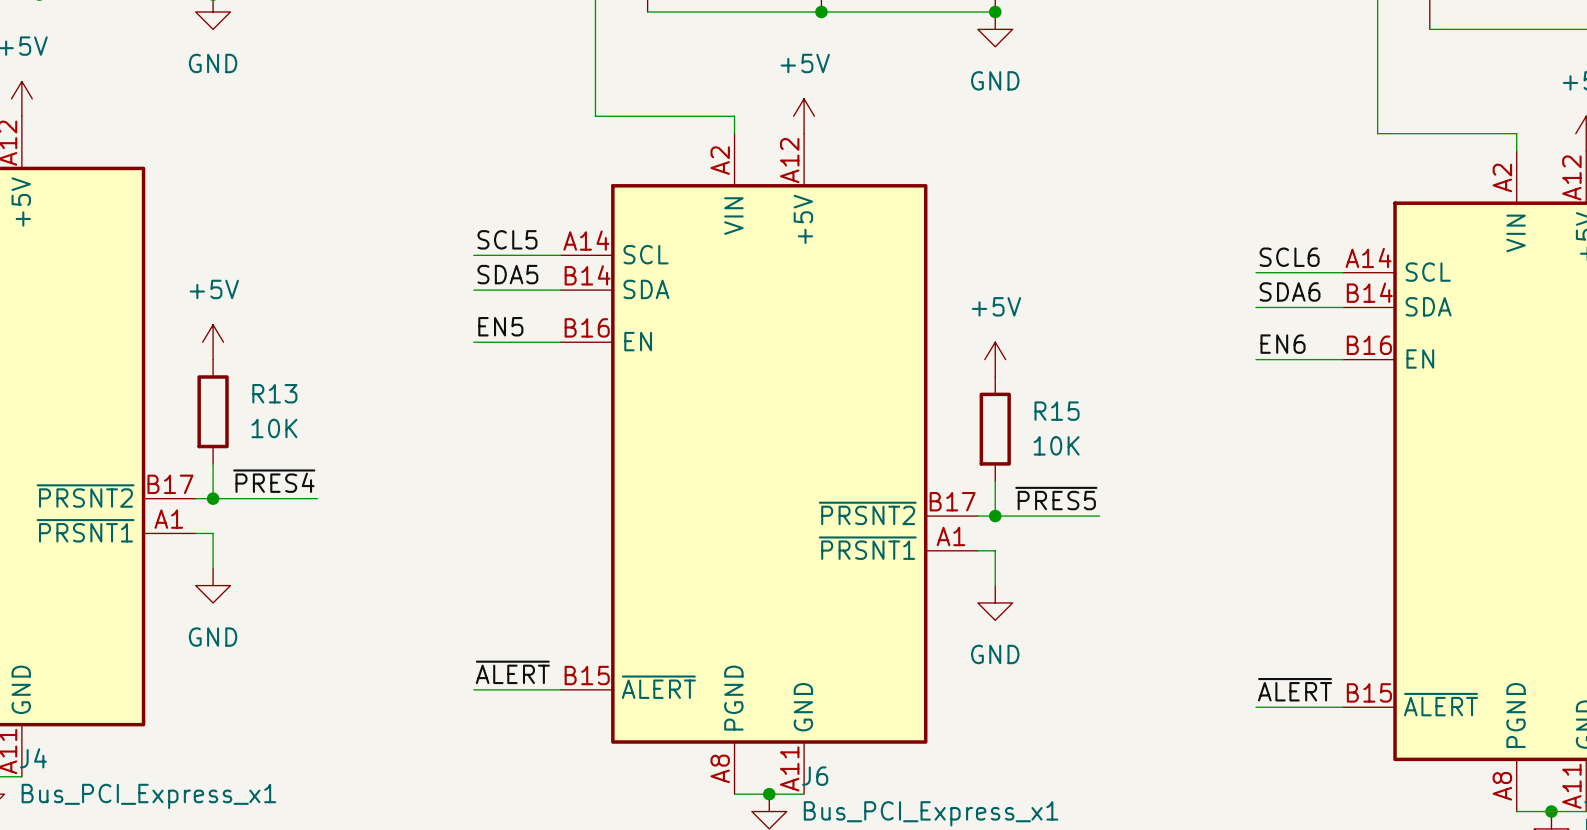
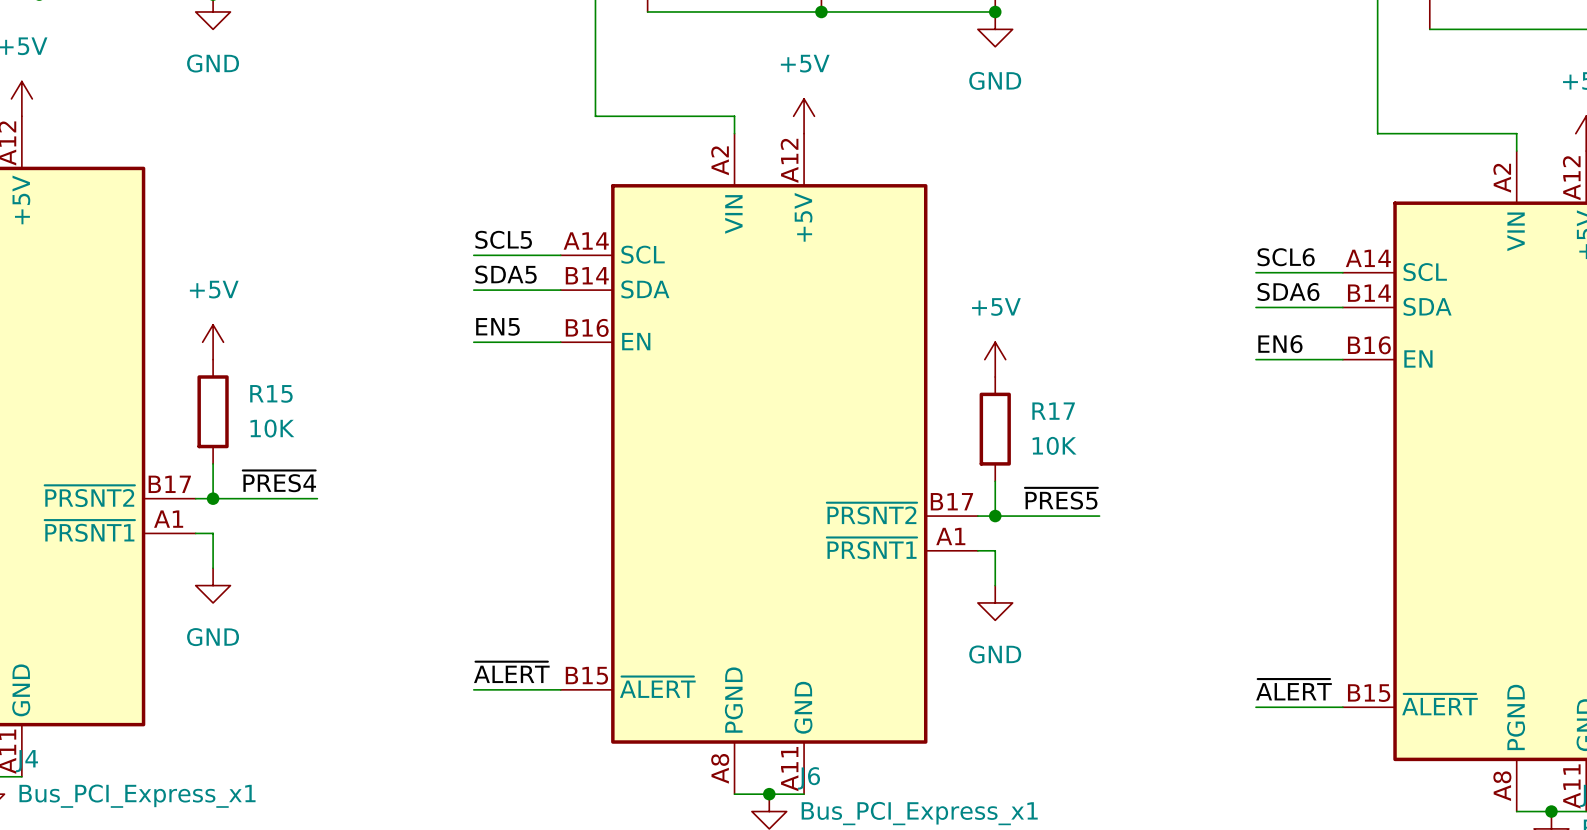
R13 name: R13 (274, 393) -> R15 (271, 393)
R15 name: R15 (1057, 411) -> R17 (1053, 411)

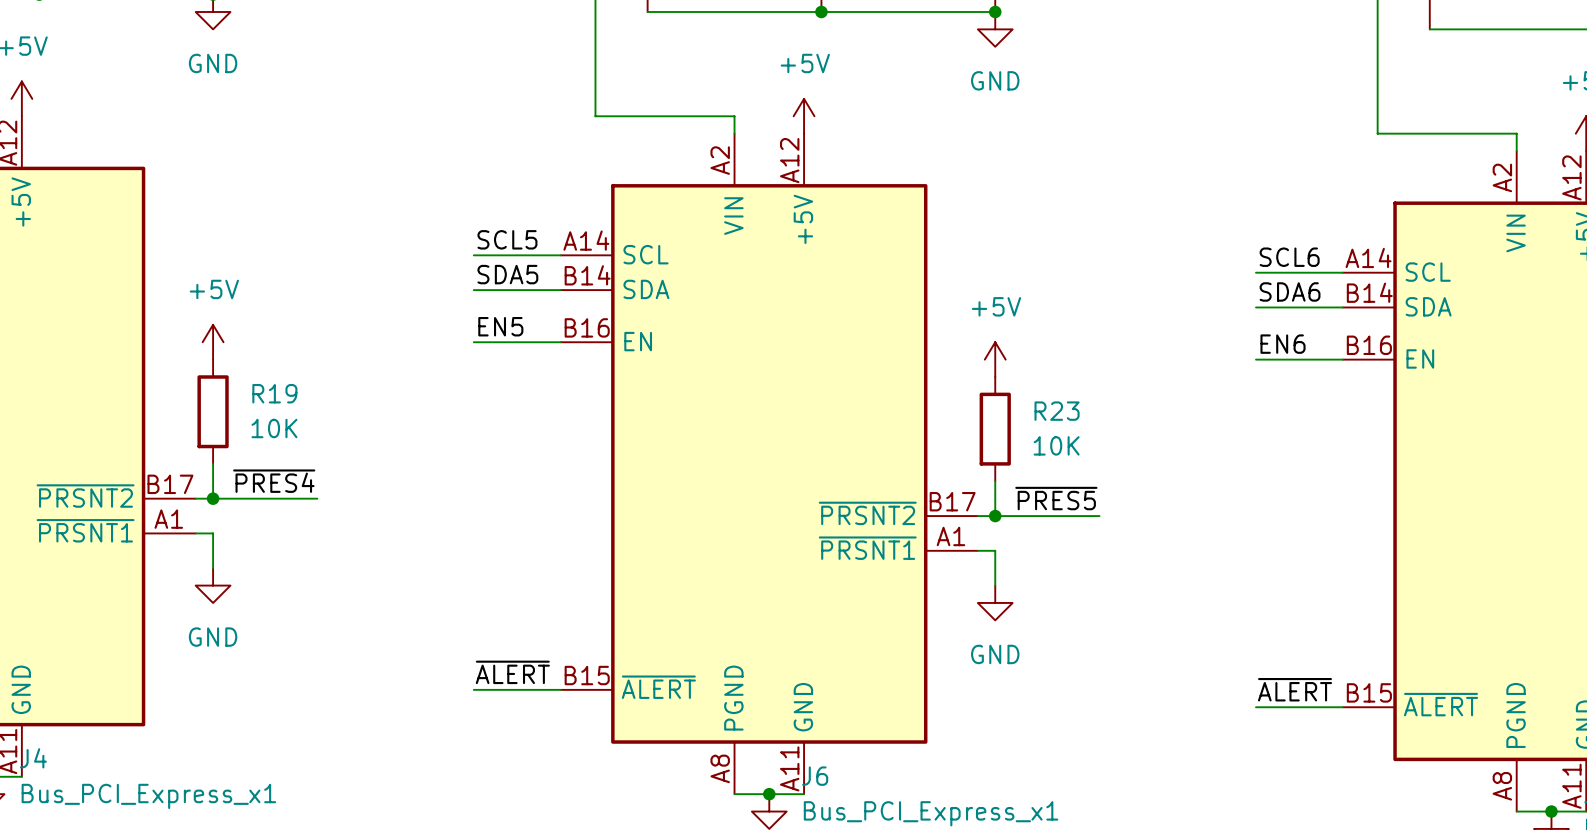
R15 name: R15 (271, 393) -> R19 (274, 393)
R17 name: R17 (1053, 411) -> R23 (1057, 411)

